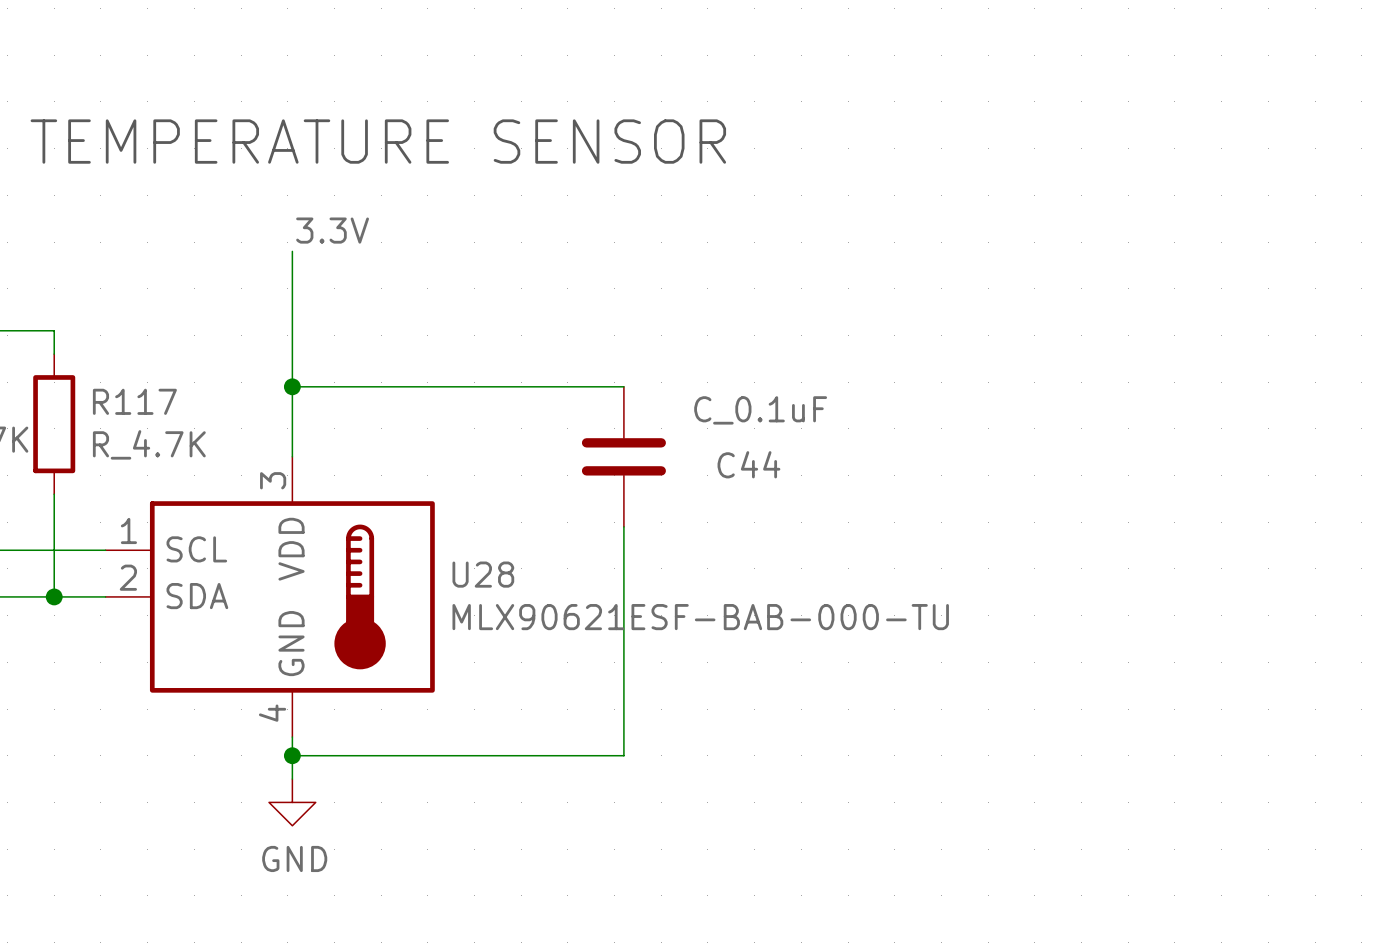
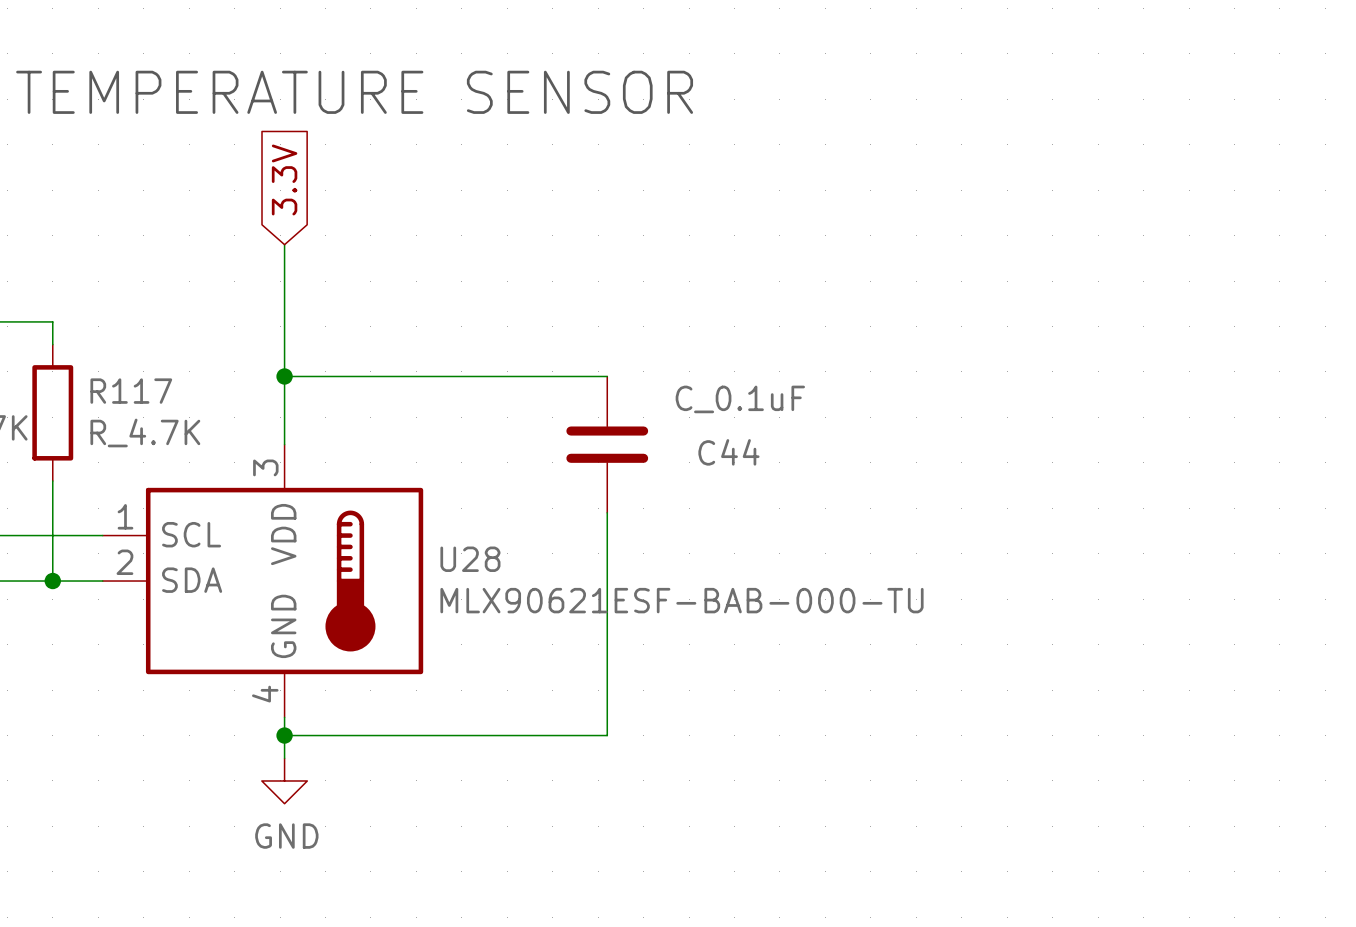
text position: TEMPERATURE SENSOR (378, 141) -> TEMPERATURE SENSOR (354, 92)
global label: none -> 3.3V (284, 179)
label: 3.3V (332, 230) -> none

